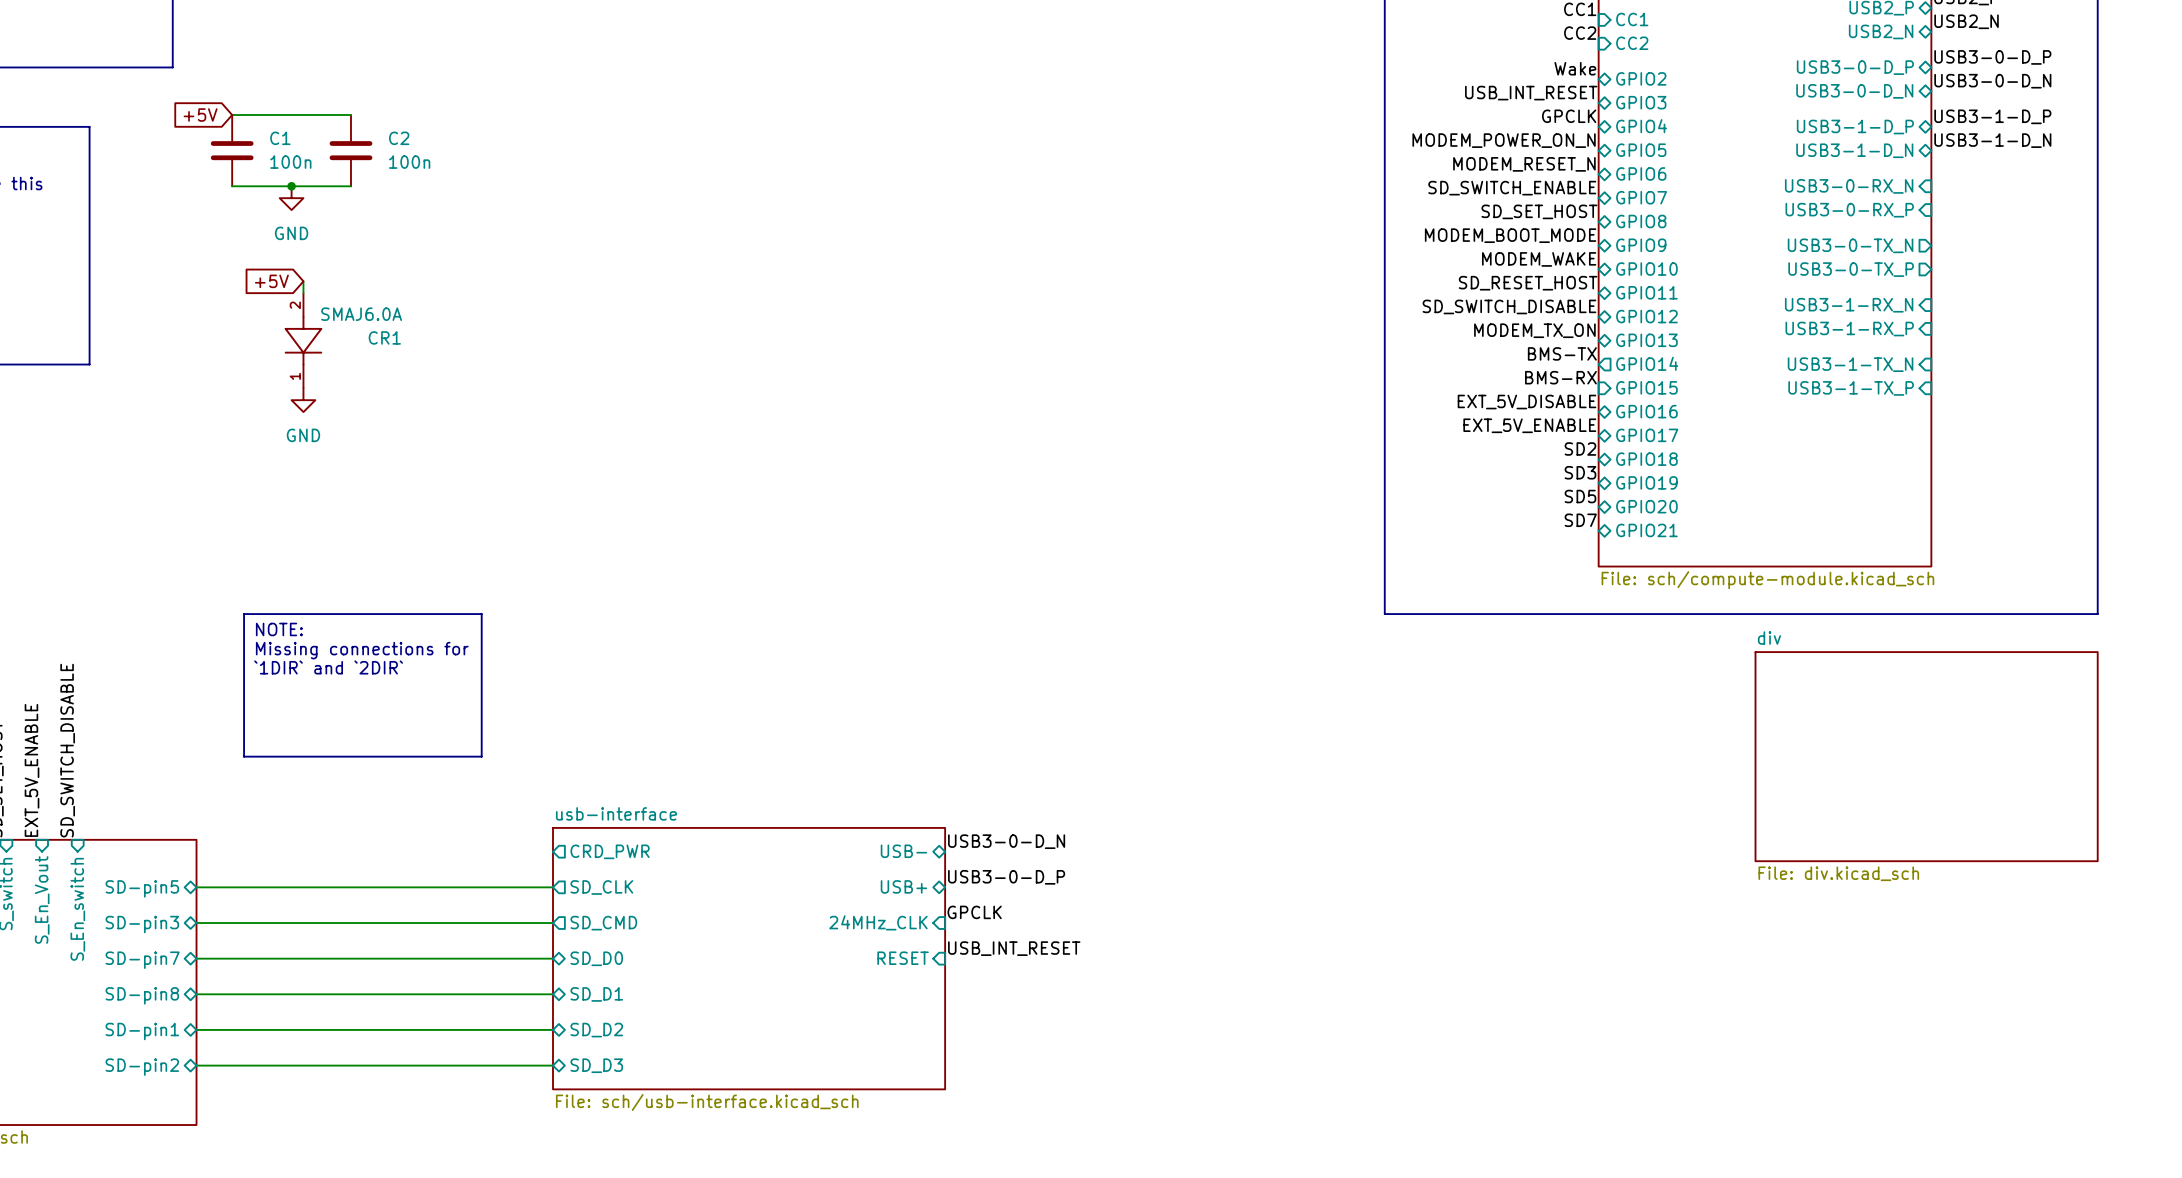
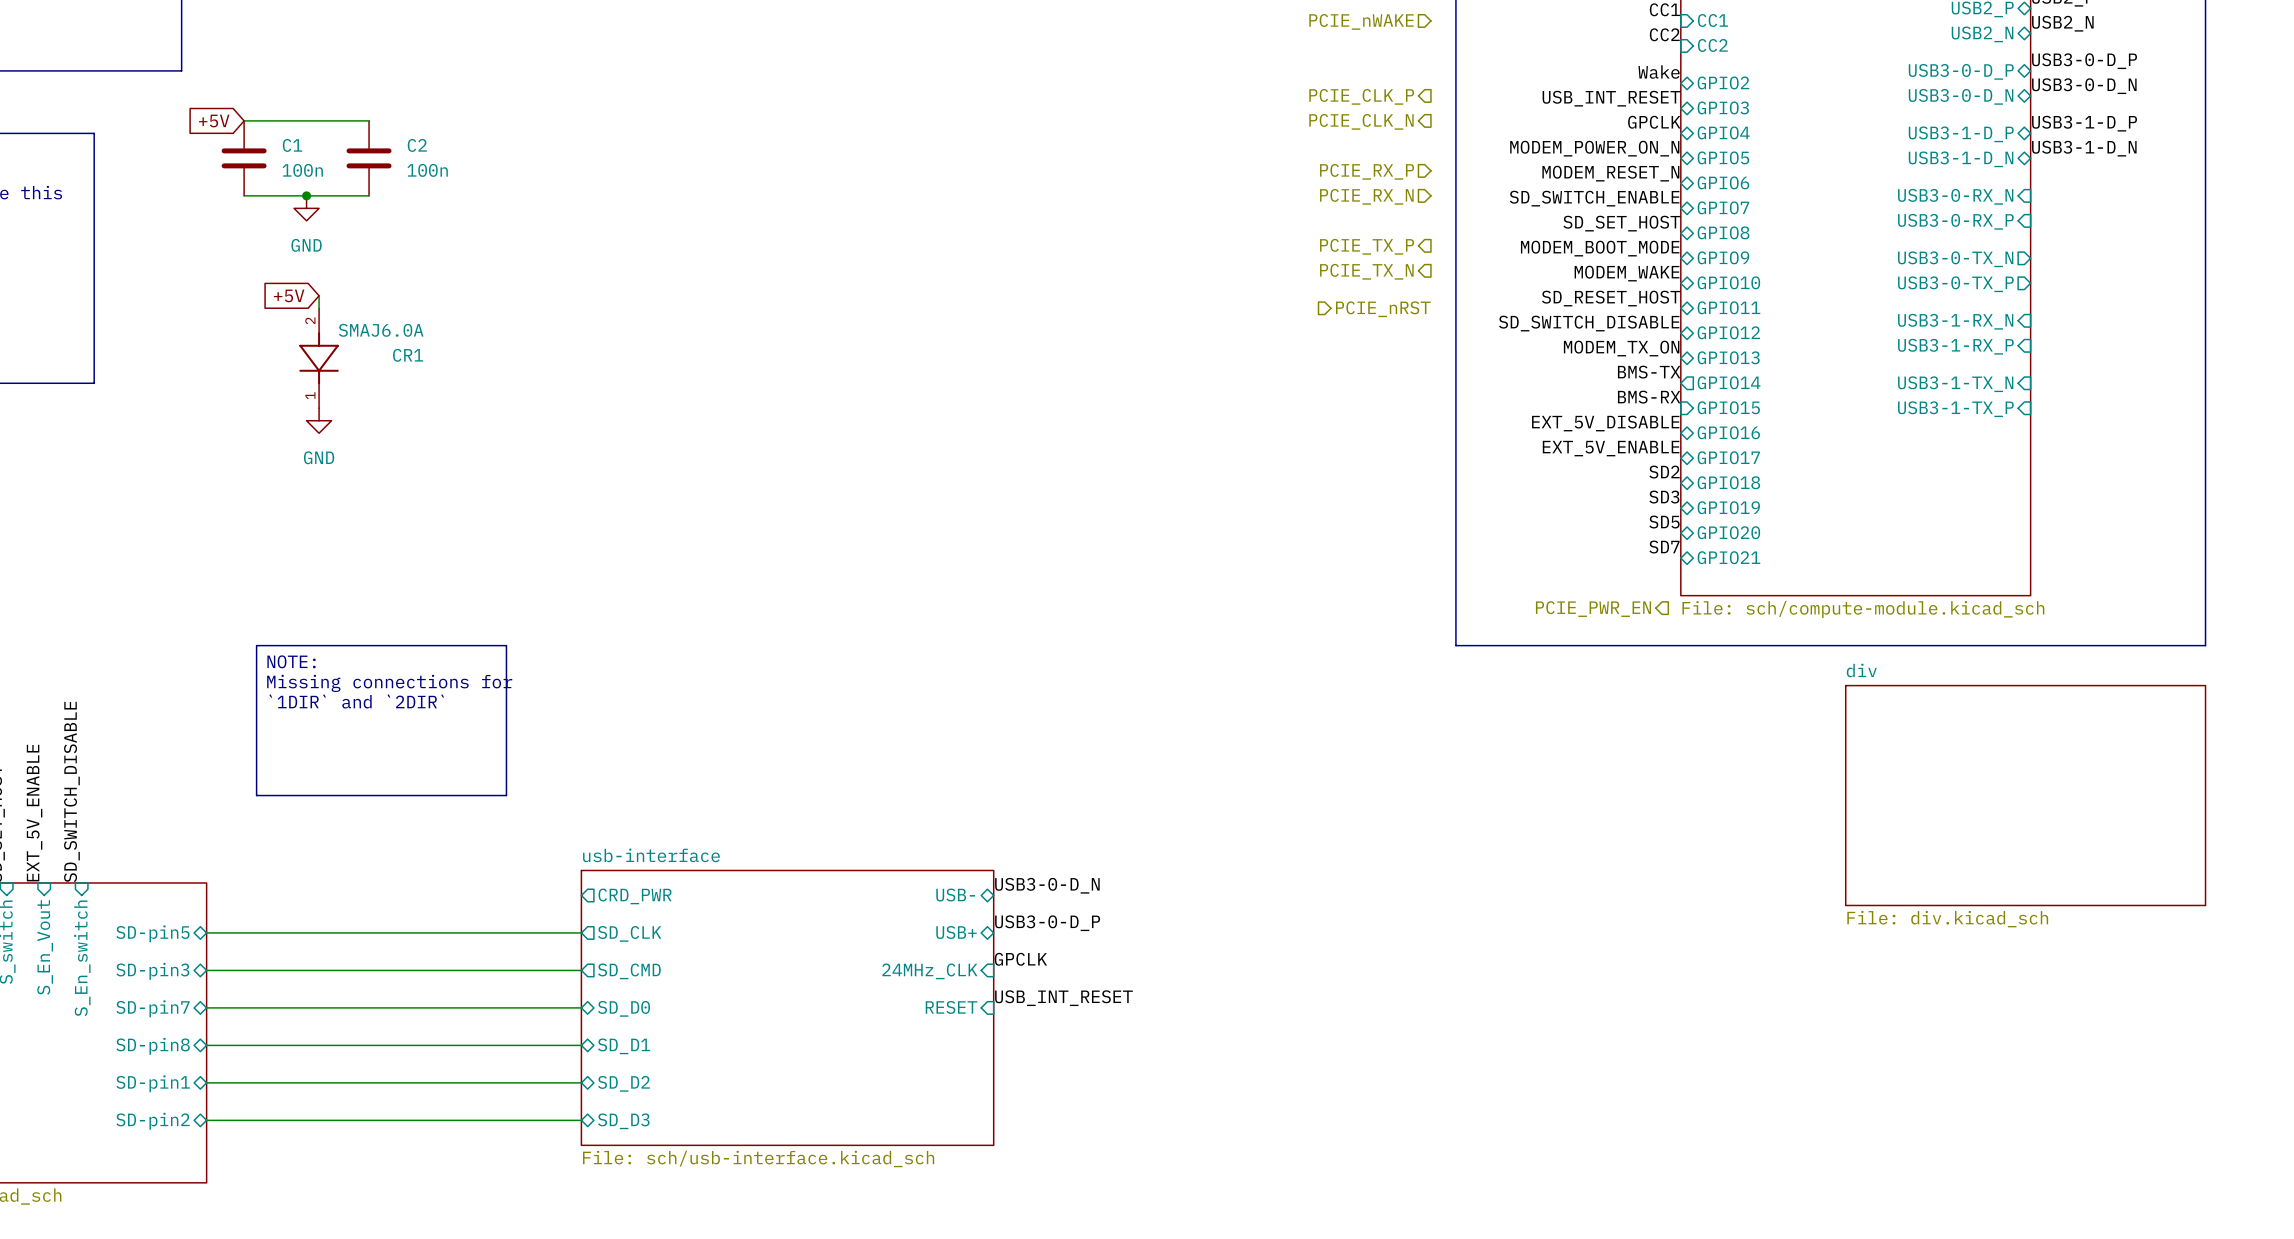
hierarchical label: none -> PCIE_nWAKE (1361, 21)
hierarchical label: none -> PCIE_CLK_P (1361, 96)
hierarchical label: none -> PCIE_CLK_N (1361, 121)
hierarchical label: none -> PCIE_RX_P (1367, 171)
hierarchical label: none -> PCIE_RX_N (1366, 196)
hierarchical label: none -> PCIE_TX_P (1367, 246)
hierarchical label: none -> PCIE_TX_N (1366, 271)
hierarchical label: none -> PCIE_nRST (1383, 309)
hierarchical label: none -> PCIE_PWR_EN (1593, 609)

